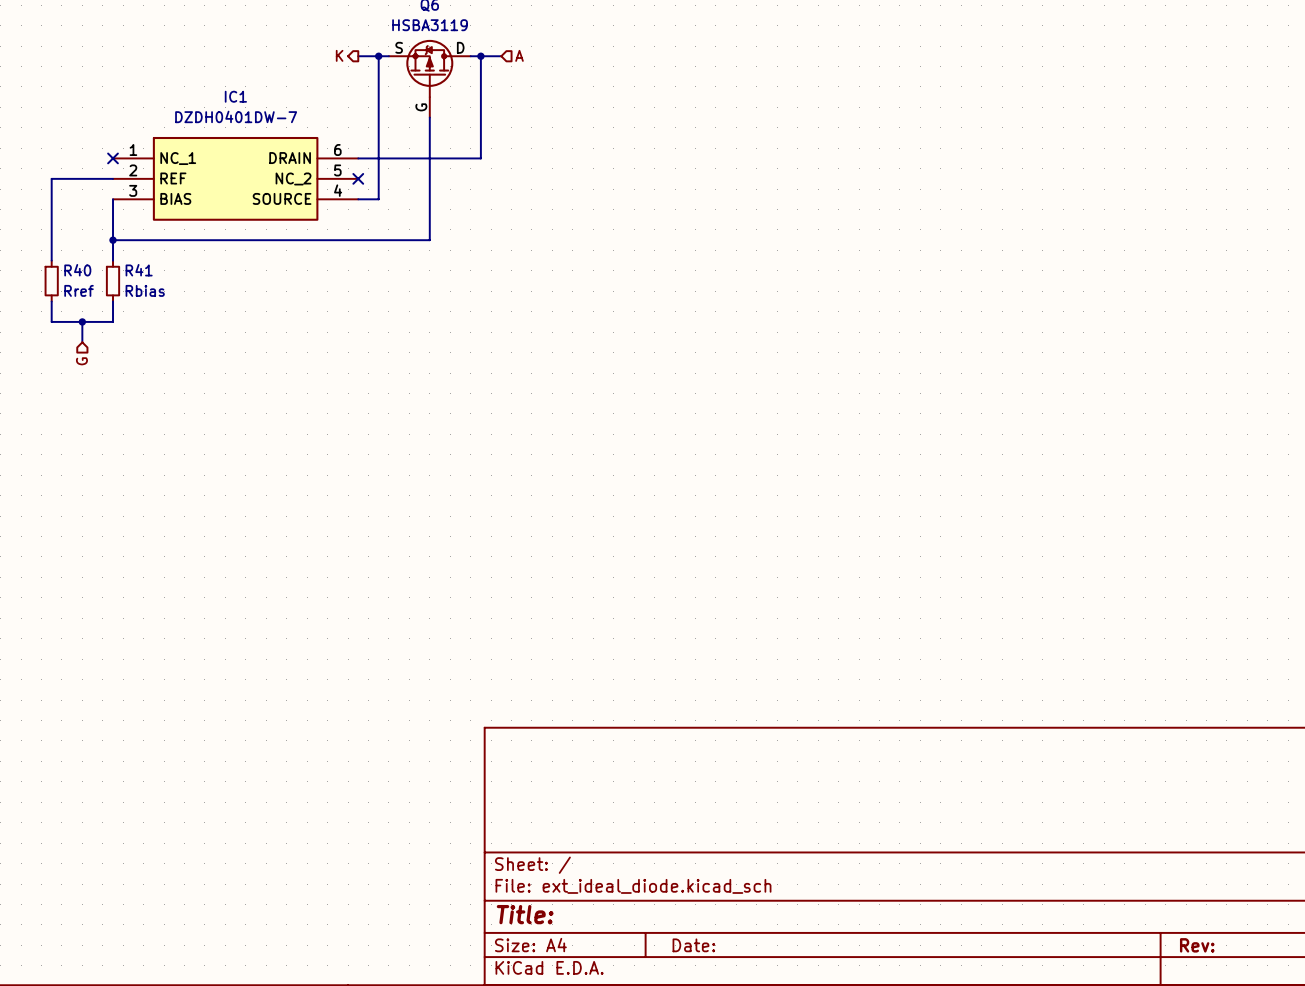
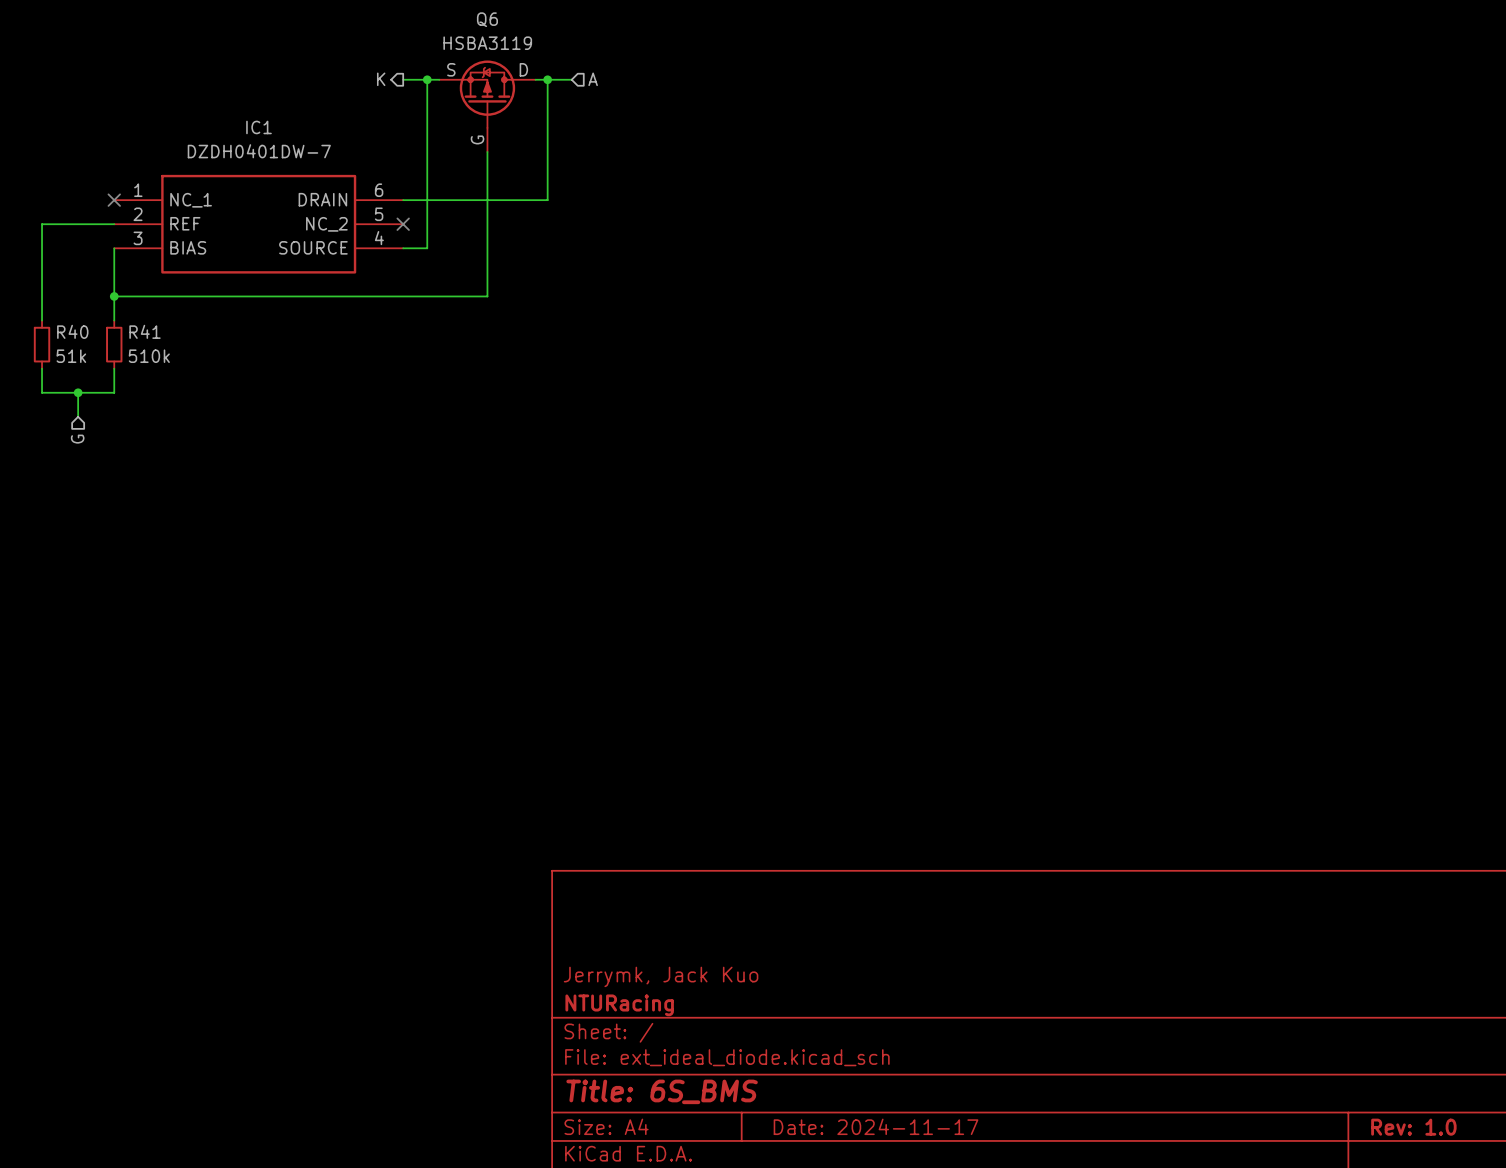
R40 value: Rref (79, 290) -> 51k (71, 356)
R41 value: Rbias (145, 290) -> 510k (149, 356)
title block: none -> Jerrymk, Jack Kuo (661, 976)
title block: none -> NTURacing (619, 1005)
title block: Title: (525, 914) -> Title: 6S_BMS (662, 1091)
title block: Date: (693, 945) -> Date: 2024-11-17 (876, 1126)
title block: Rev: (1197, 945) -> Rev: 1.0 (1413, 1127)

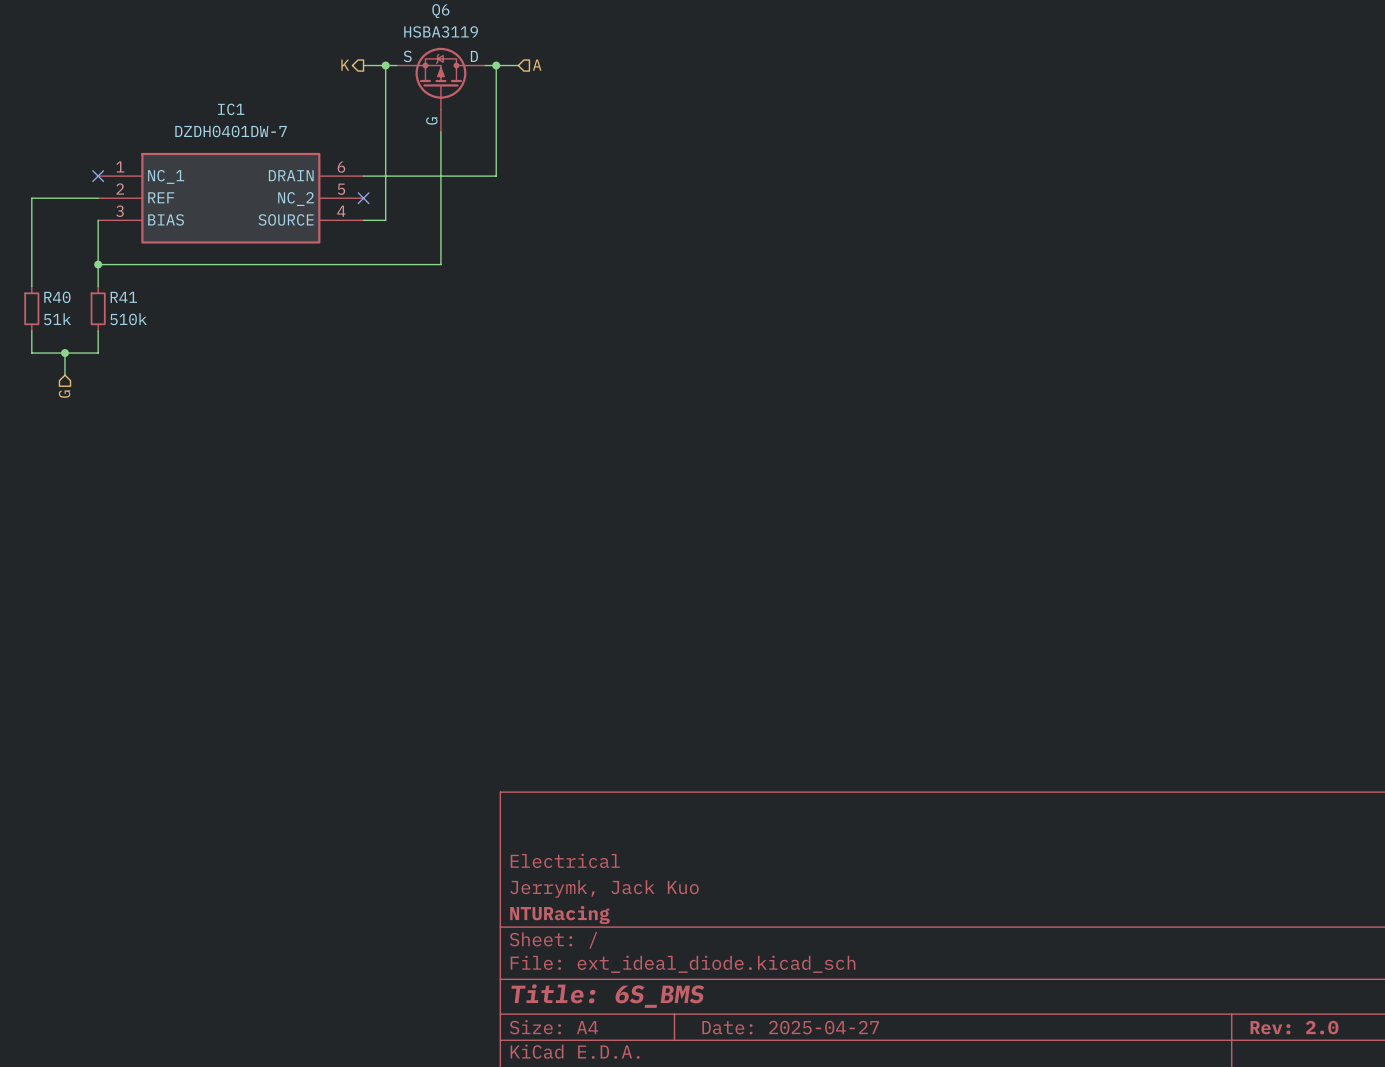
title block: none -> Electrical (565, 860)
title block: Date: 2024-11-17 (876, 1126) -> Date: 2025-04-27 (790, 1027)
title block: Rev: 1.0 (1413, 1127) -> Rev: 2.0 (1294, 1027)

